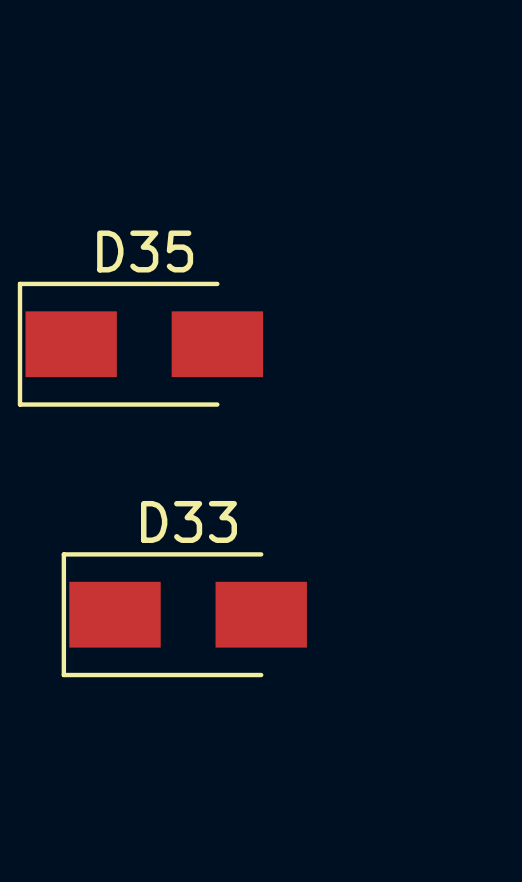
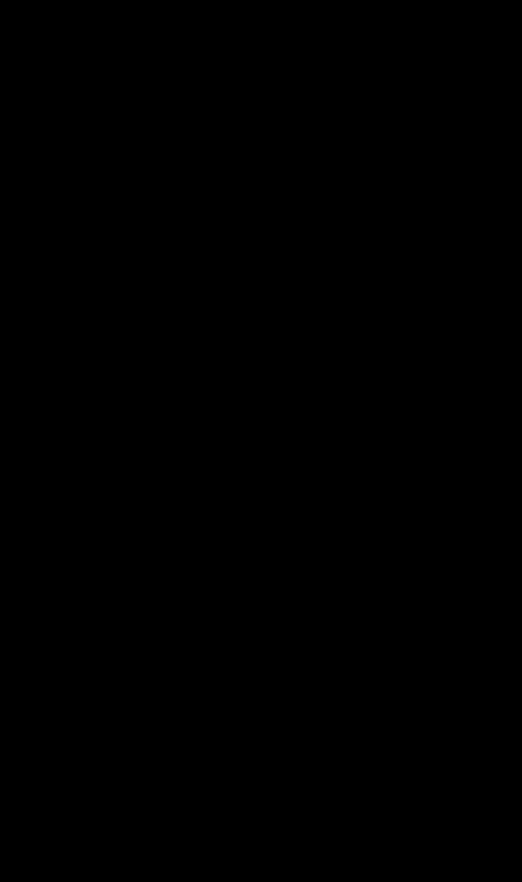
D35: (140, 344) -> none
D33: (184, 614) -> none

